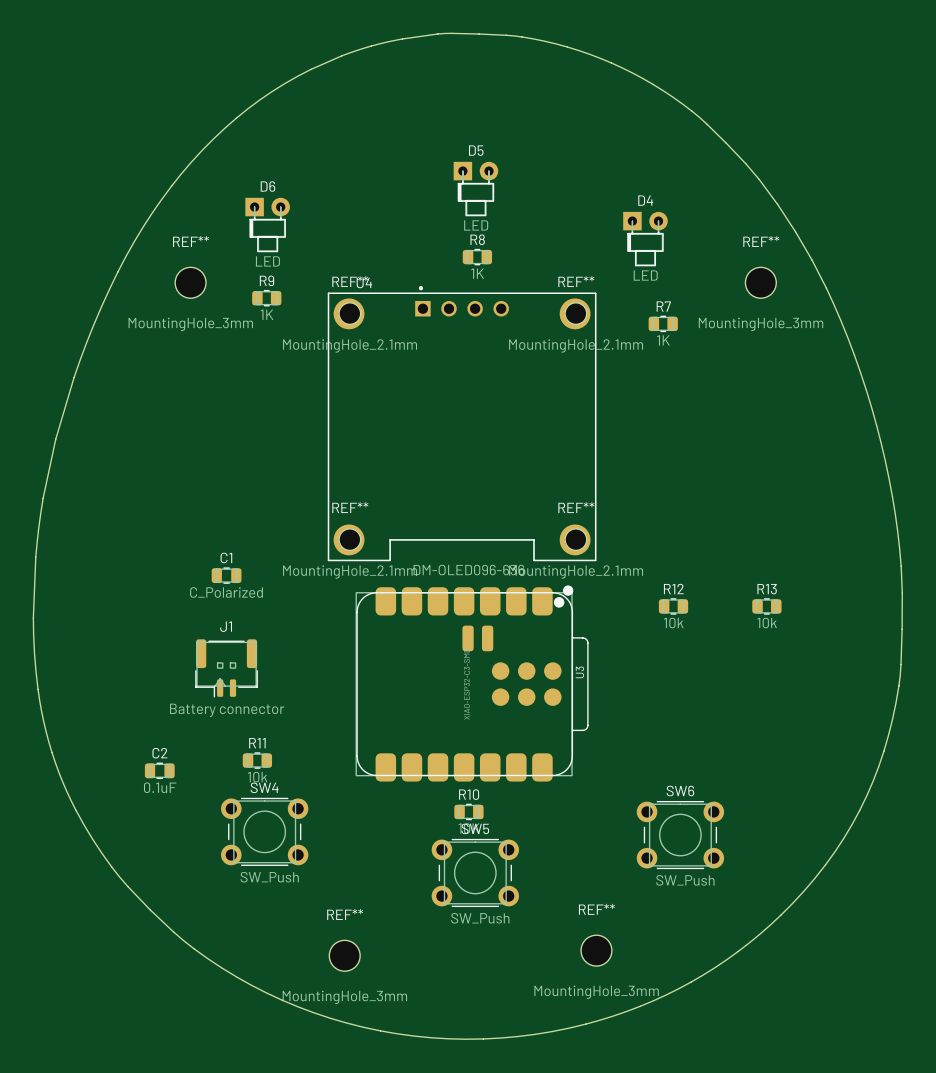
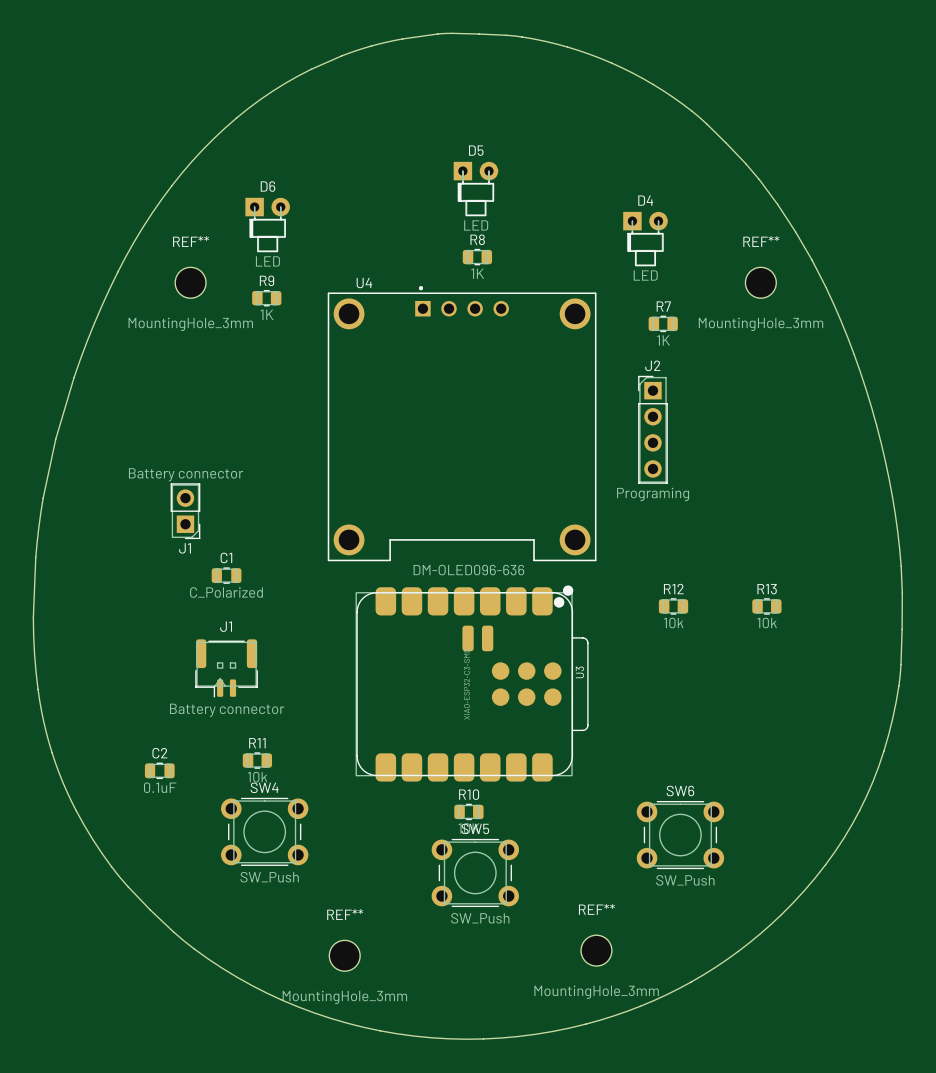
REF**: MountingHole_2.1mm (349, 313) -> none
REF**: MountingHole_2.1mm (575, 313) -> none
J2: none -> Programing (652, 429)
J1: none -> Battery connector (185, 511)
REF**: MountingHole_2.1mm (349, 539) -> none
REF**: MountingHole_2.1mm (575, 539) -> none

